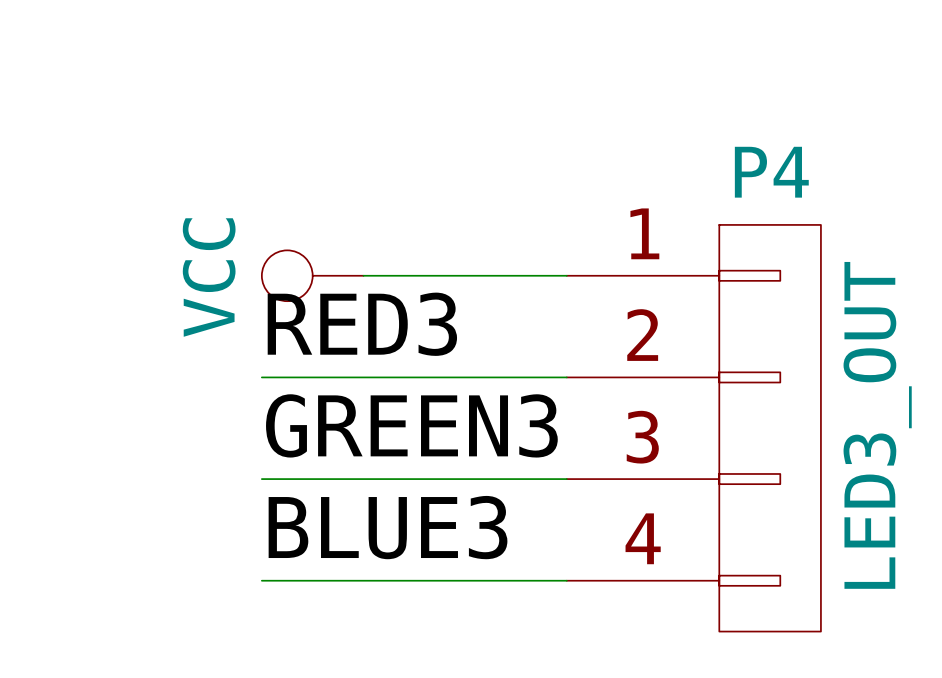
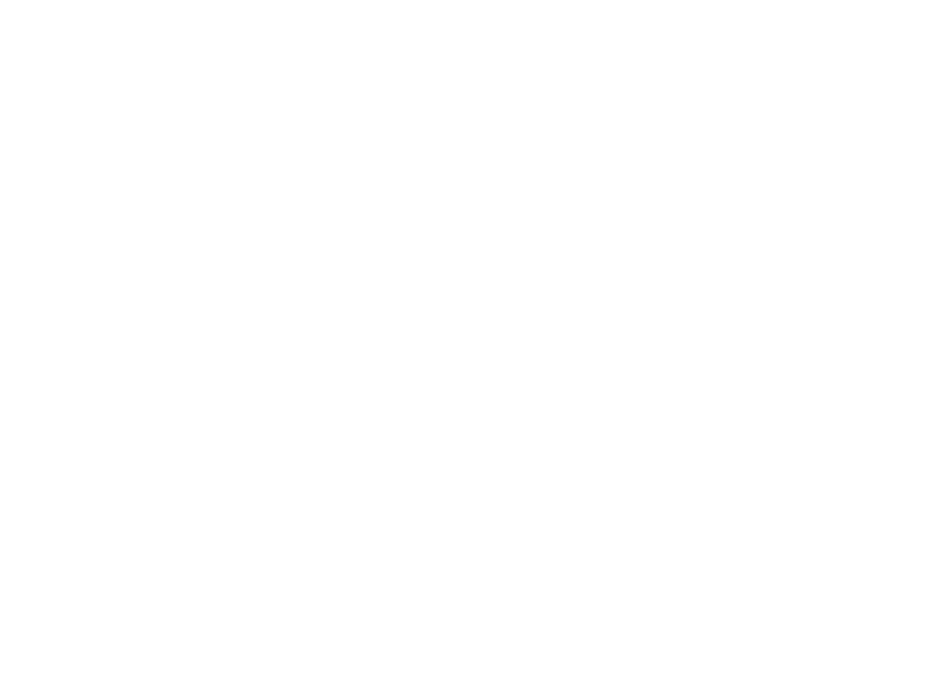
power symbol: VCC (312, 275) -> none
wire: (363, 275) (566, 275) -> none
label: RED3 (362, 324) -> none
wire: (261, 377) (566, 377) -> none
label: GREEN3 (411, 425) -> none
P4: LED3_OUT (693, 428) -> none
wire: (261, 479) (566, 479) -> none
label: BLUE3 (388, 527) -> none
wire: (261, 580) (566, 580) -> none

